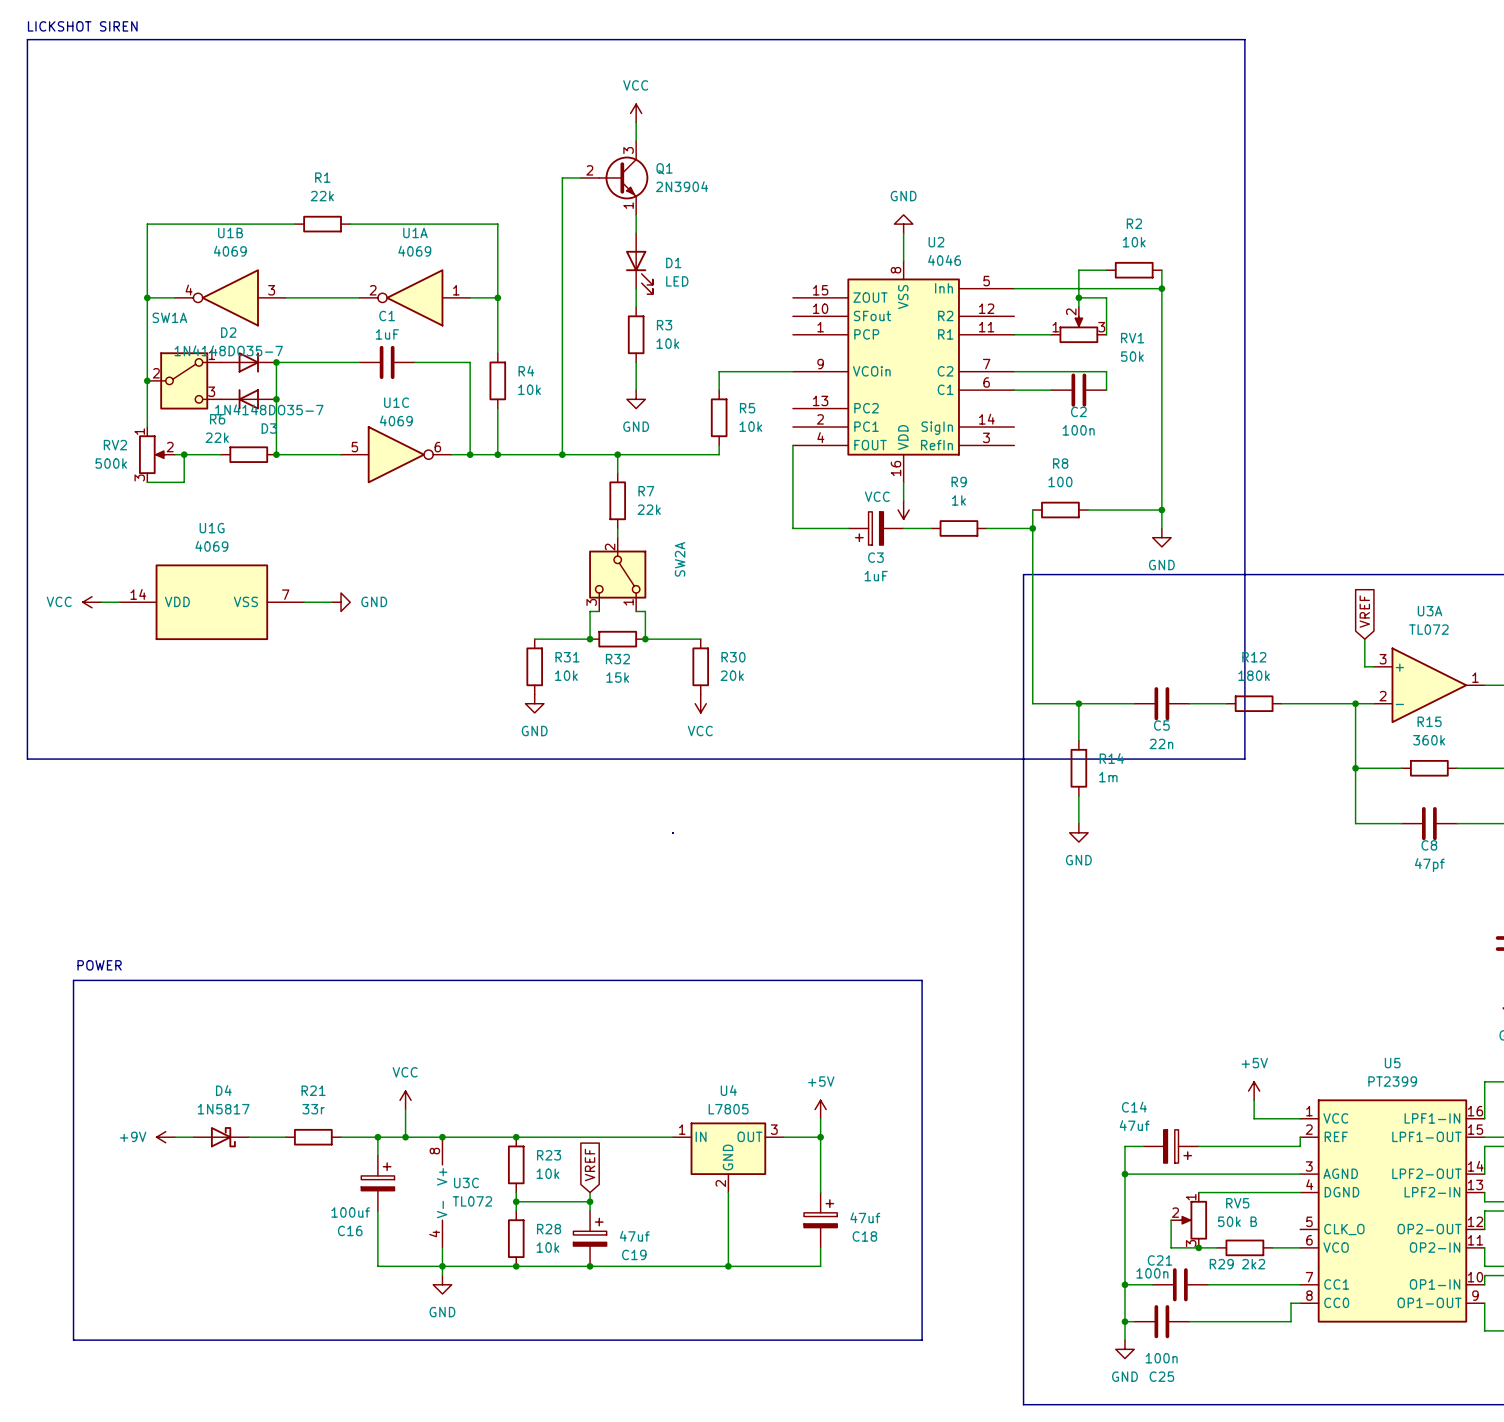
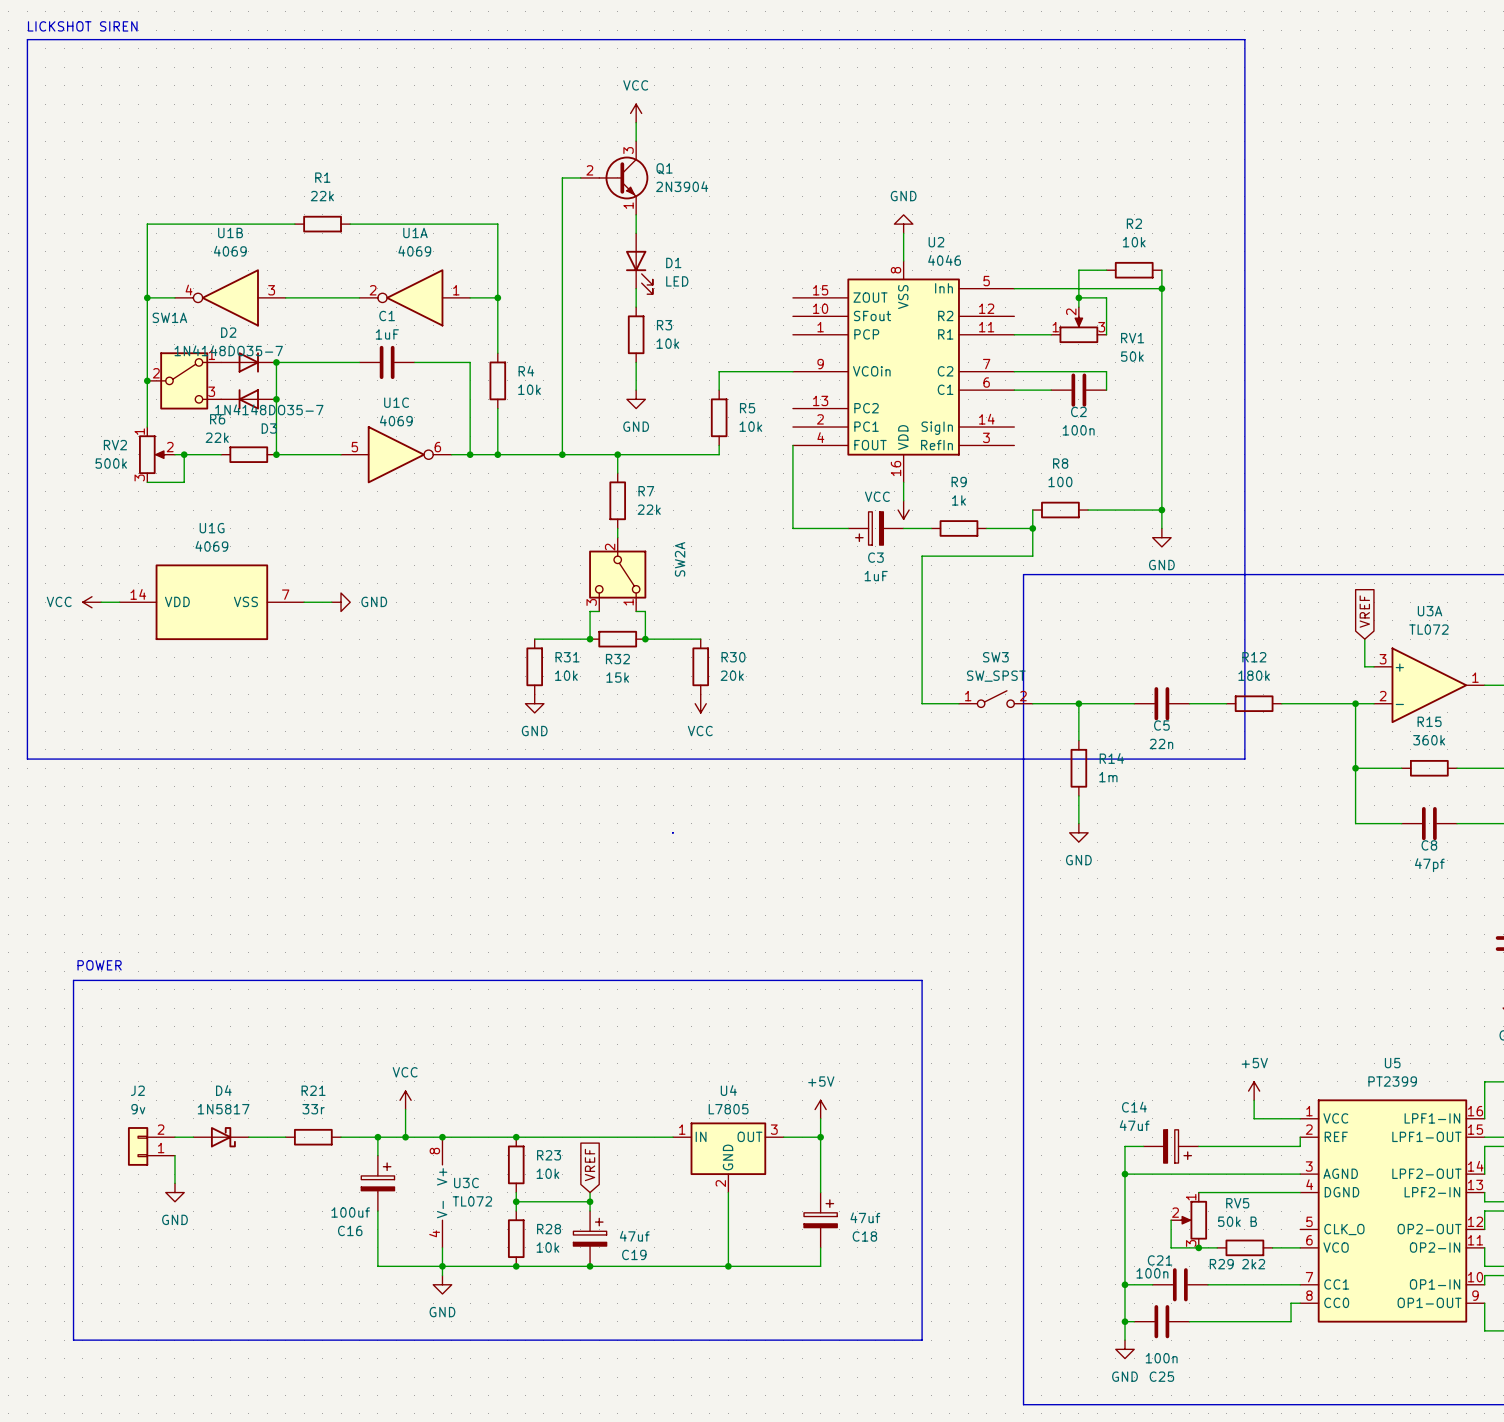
wire: (1032, 556) (1032, 703) -> (1032, 556) (922, 556) (922, 703) (958, 703)
SW3: none -> SW_SPST (995, 699)
power symbol: +9V (165, 1137) -> none
J2: none -> 9v (151, 1146)
wire: none -> (174, 1155) (174, 1183)
power symbol: none -> GND (174, 1192)

